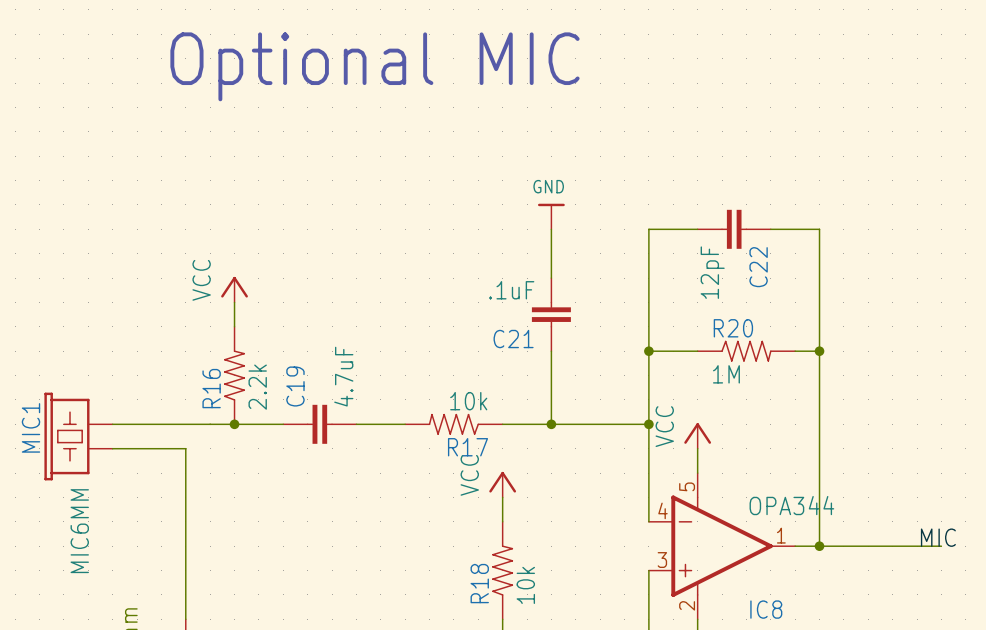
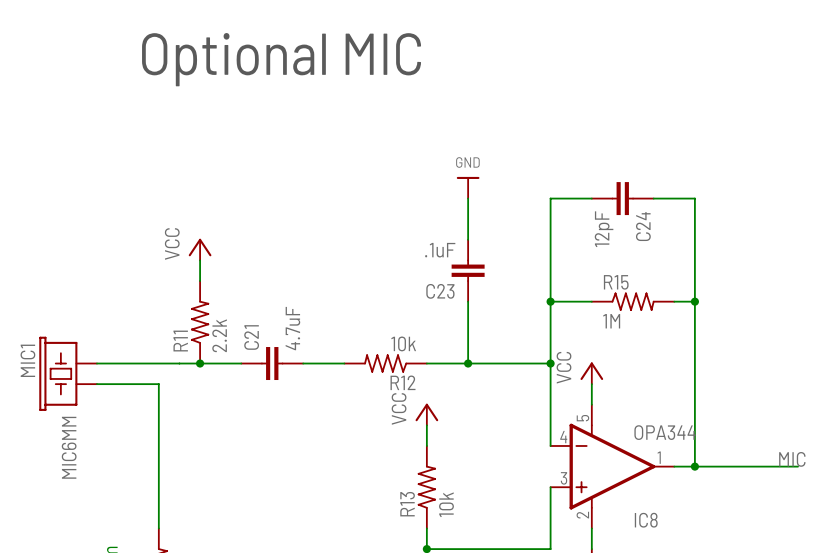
C22 name: C22 (758, 267) -> C24 (643, 226)
R20 name: R20 (733, 328) -> R15 (616, 282)
C21 name: C21 (513, 339) -> C23 (440, 291)
C19 name: C19 (295, 386) -> C21 (251, 337)
R16 name: R16 (211, 388) -> R11 (180, 341)
R17 name: R17 (467, 447) -> R12 (403, 382)
R18 name: R18 (479, 583) -> R13 (407, 504)

